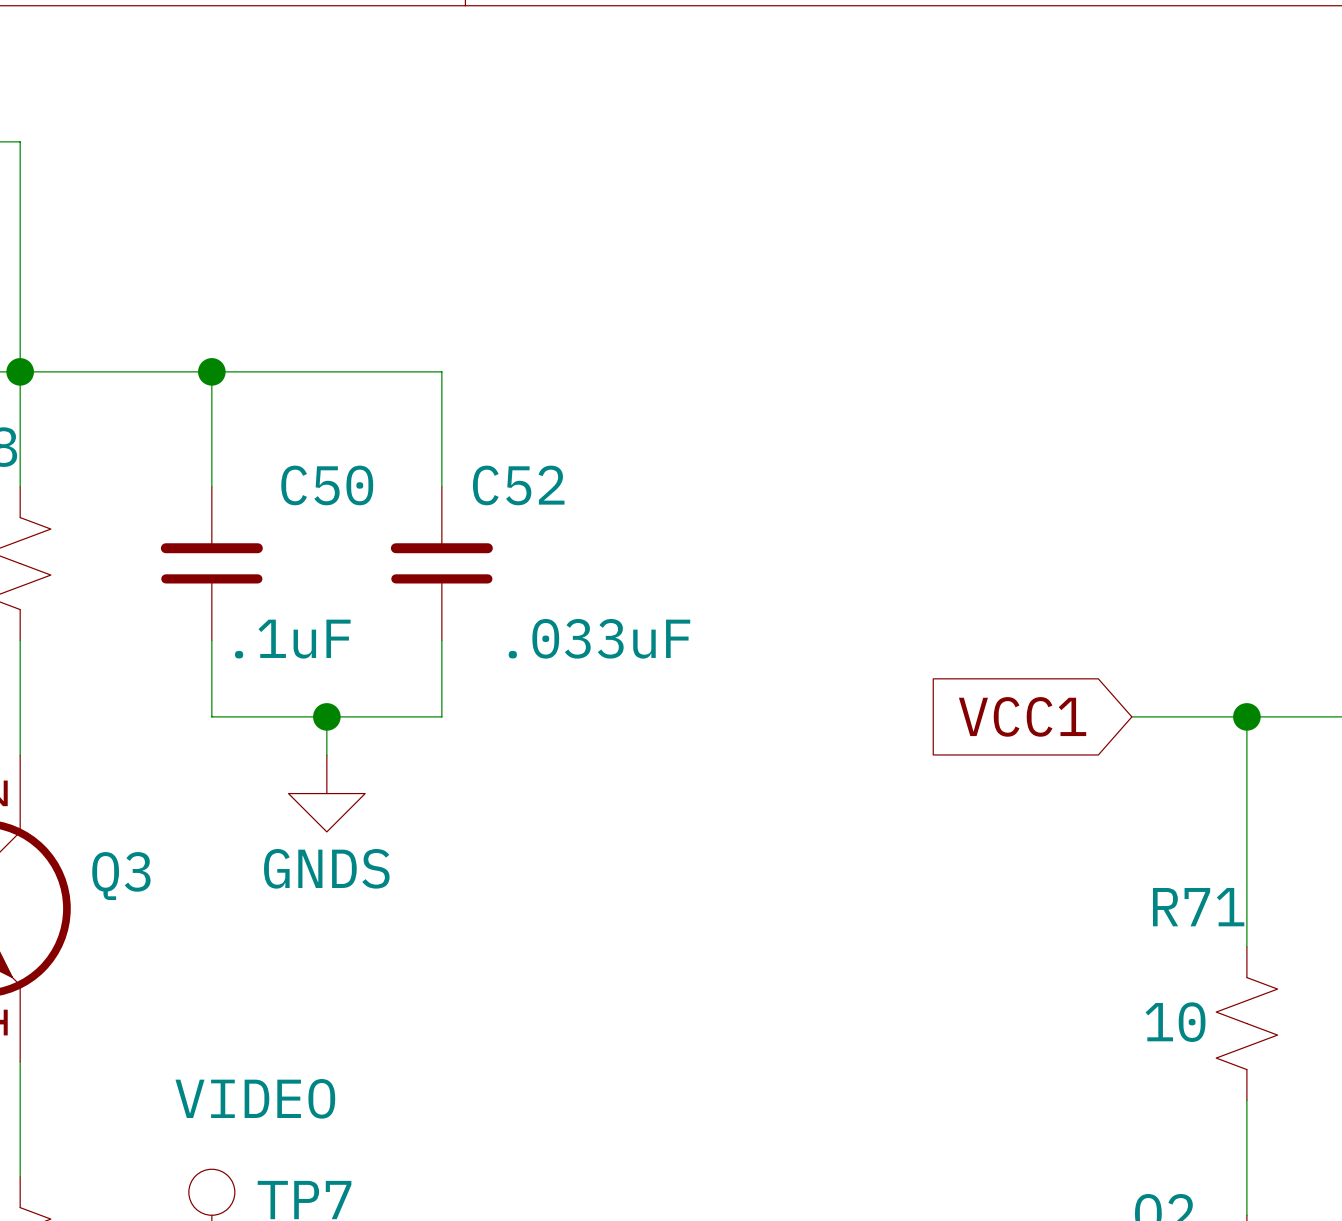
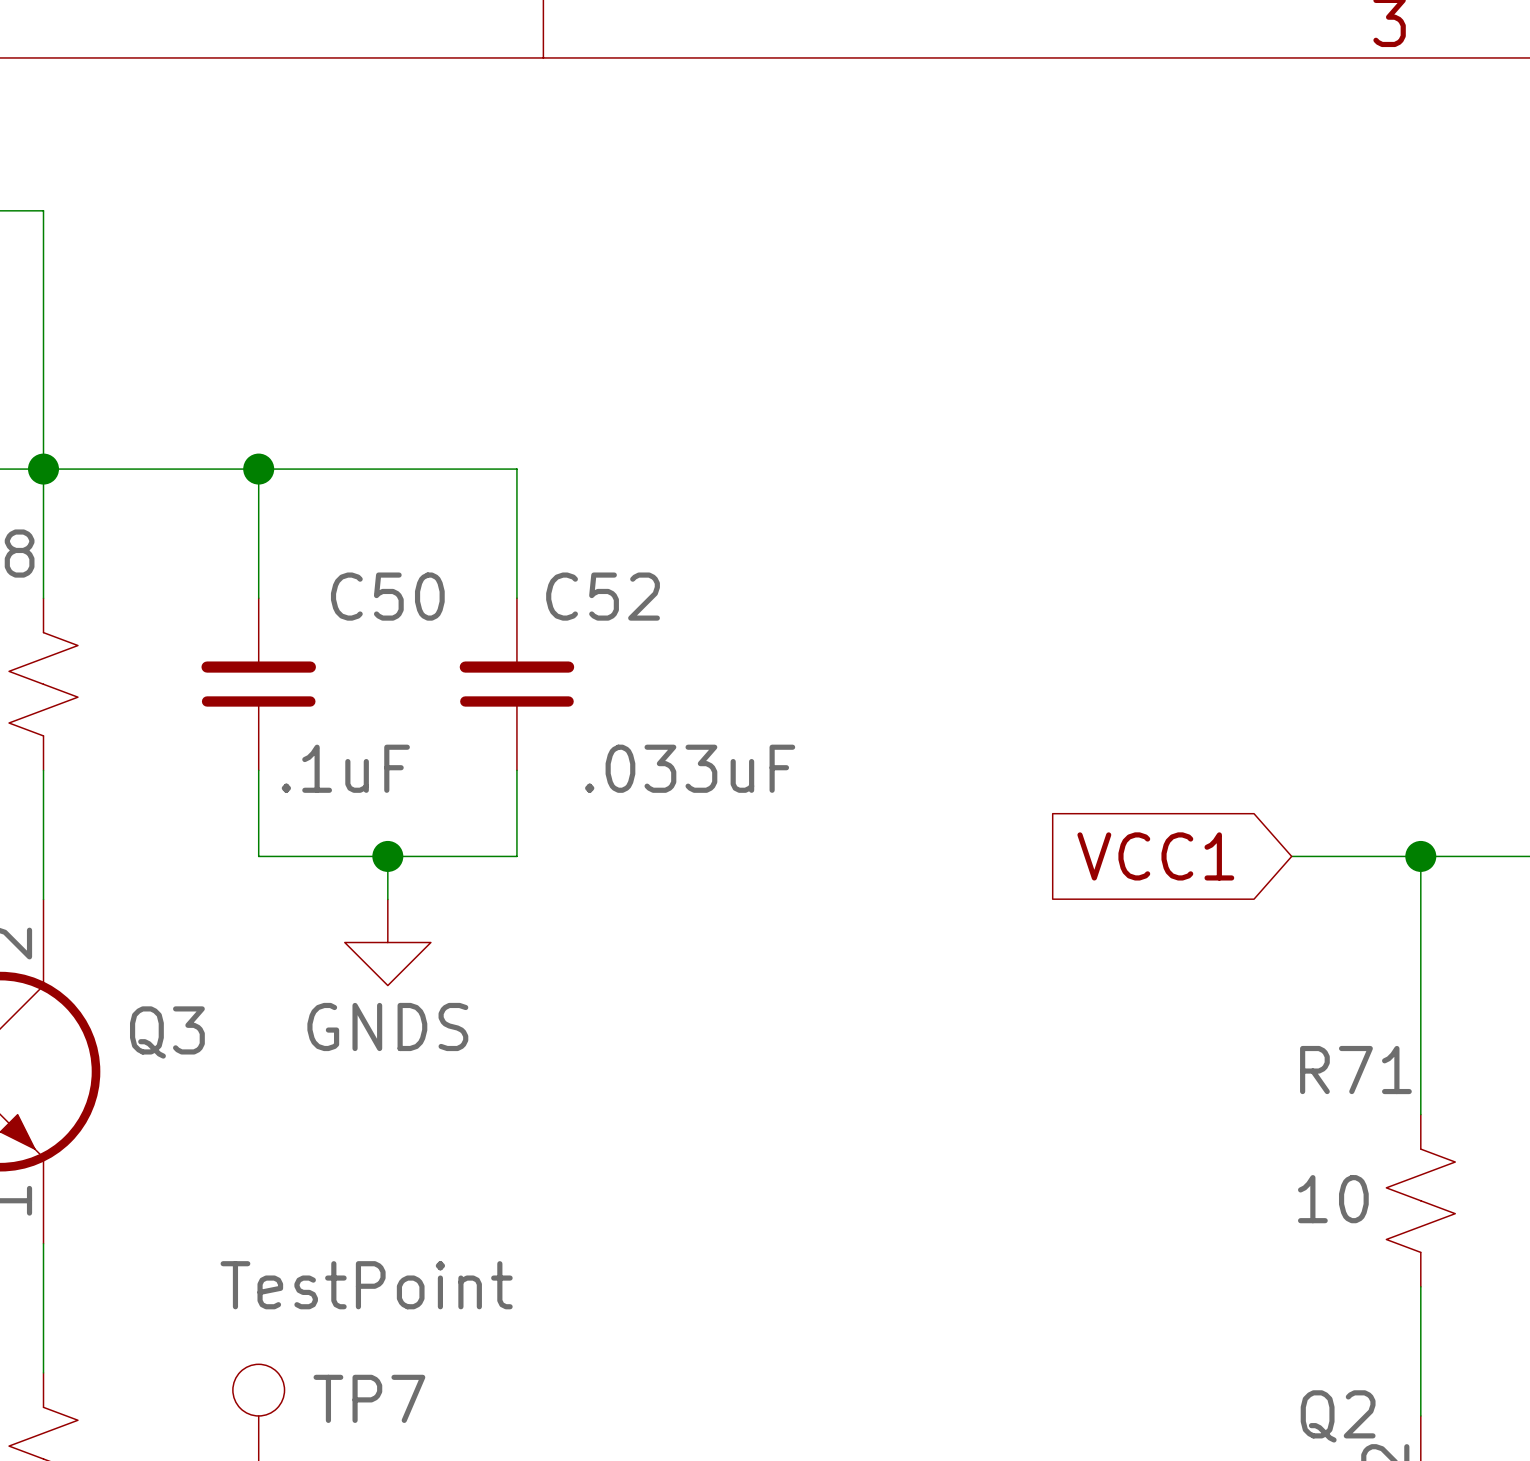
TP7 value: VIDEO (255, 1098) -> TestPoint (366, 1285)

